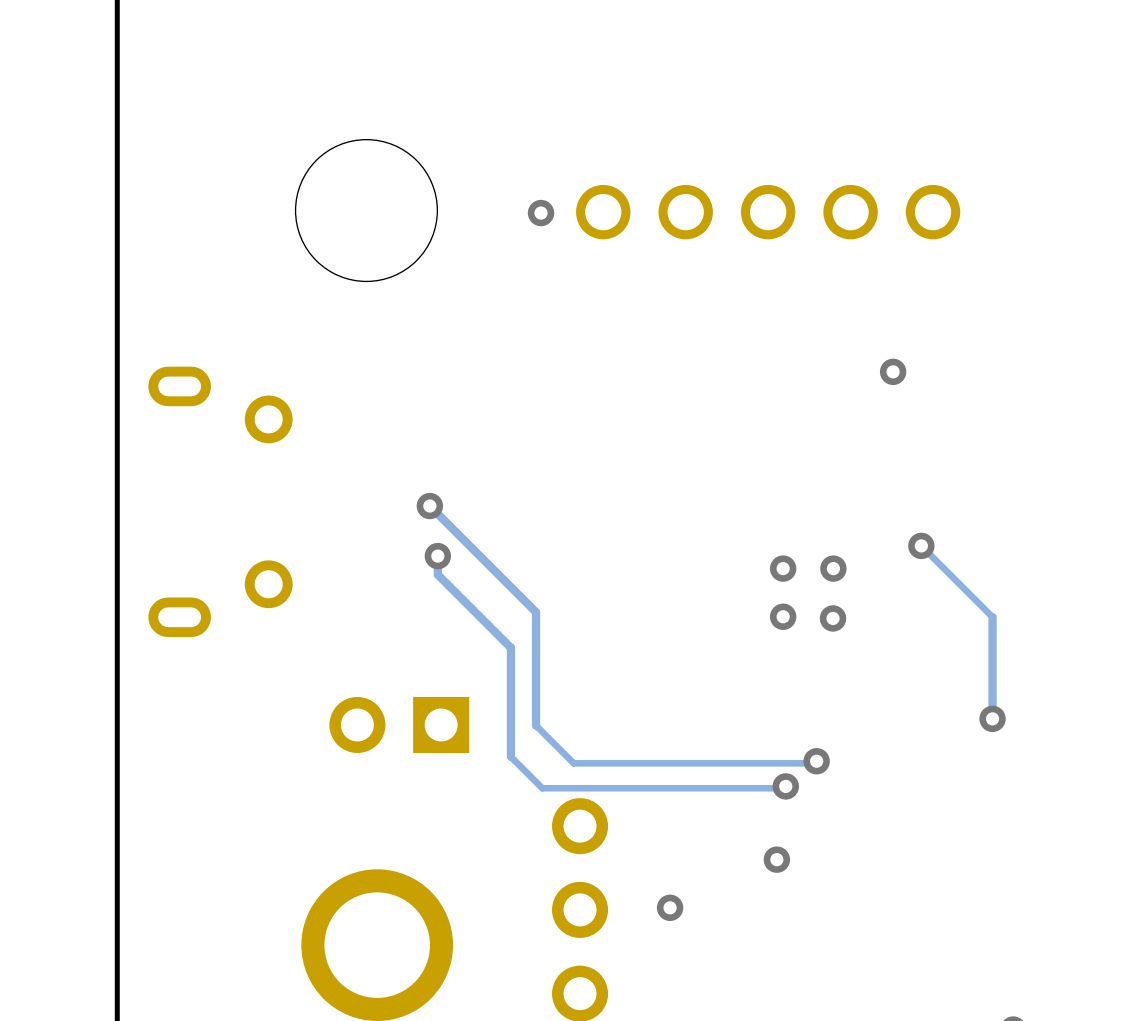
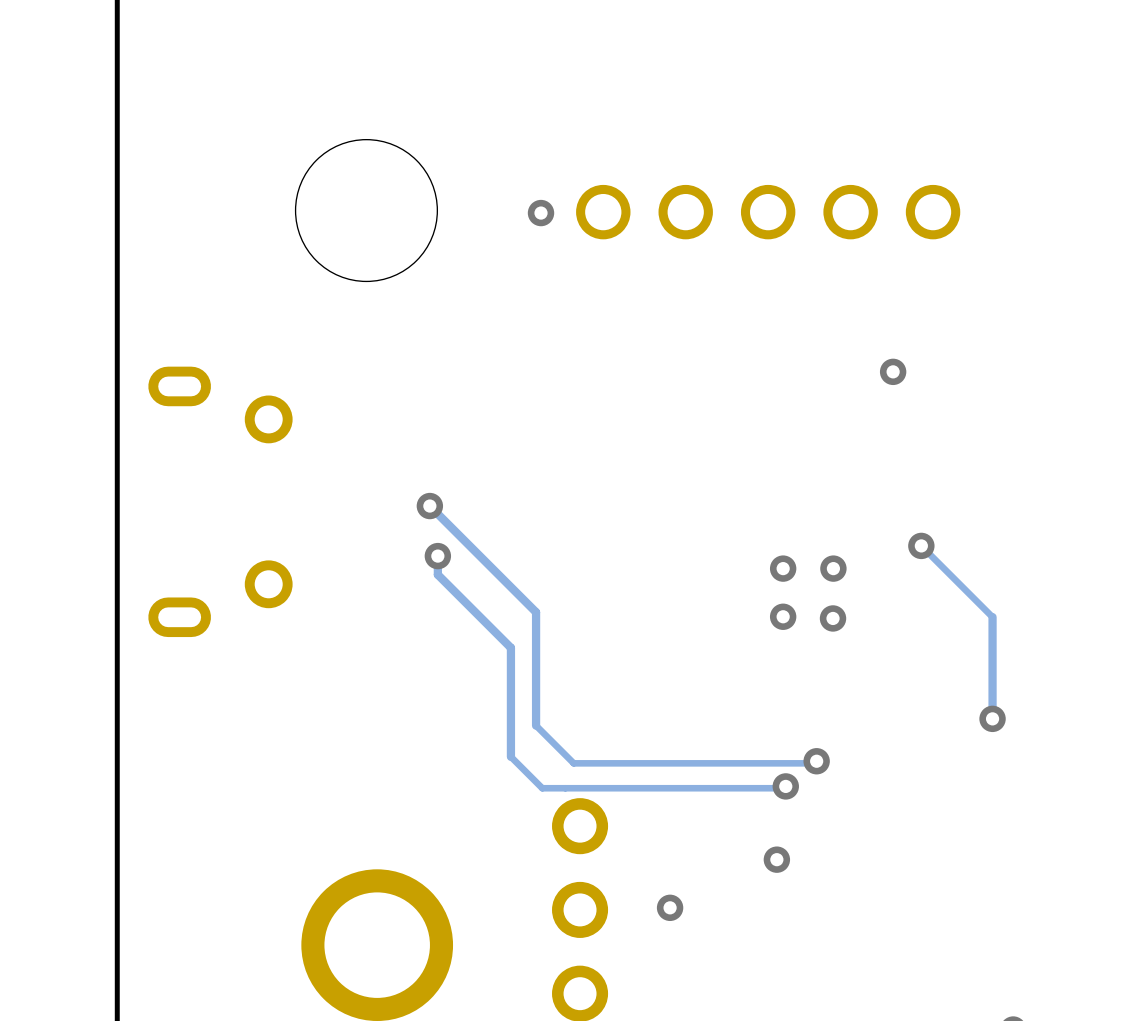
part: (399, 724) -> none

